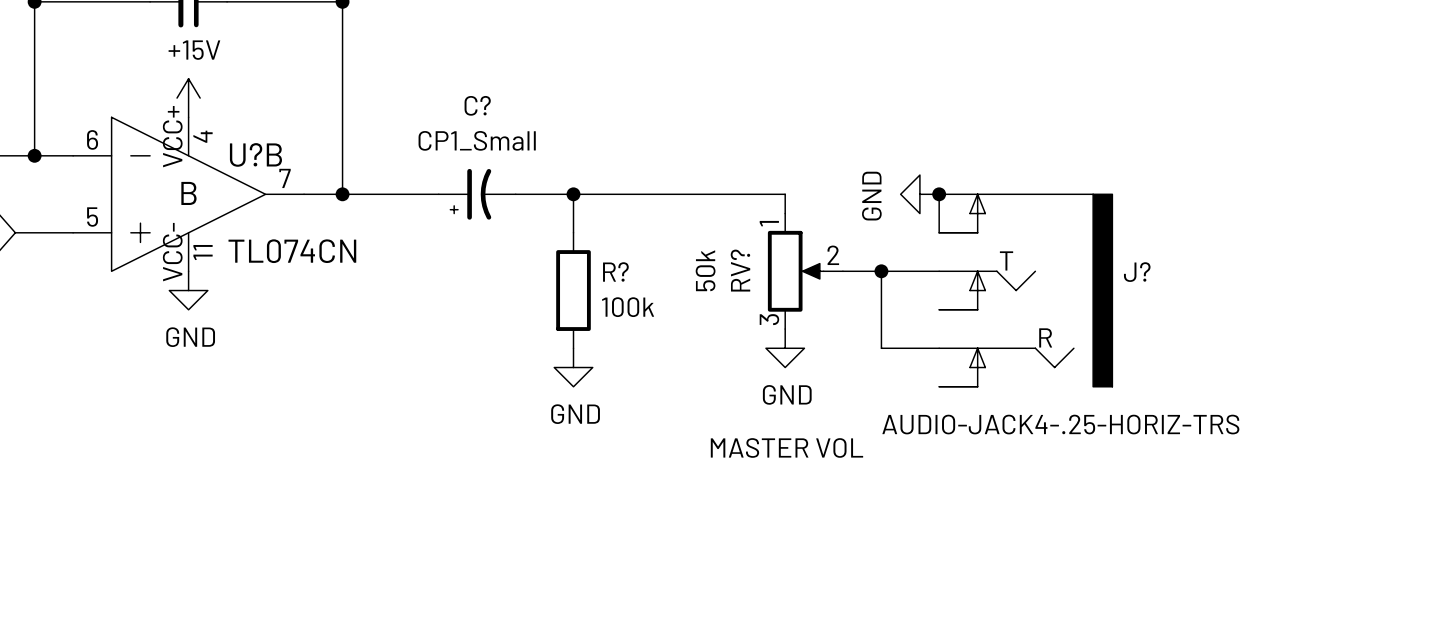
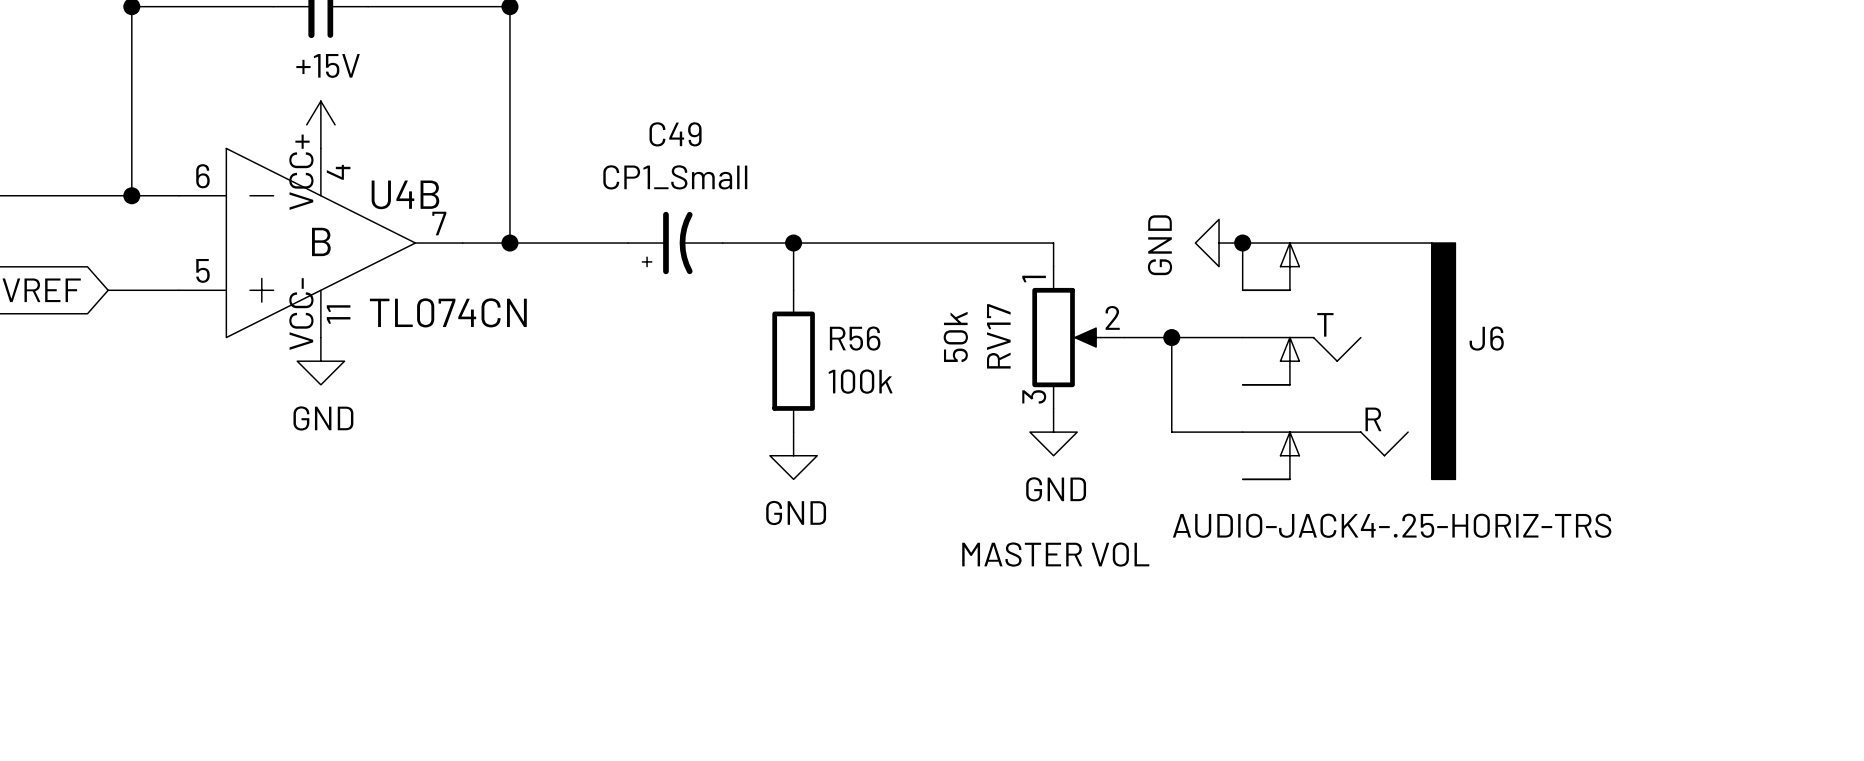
C? name: C? (477, 105) -> C49 (675, 134)
U?B name: U?B (255, 154) -> U4B (405, 194)
RV? name: RV? (740, 270) -> RV17 (998, 336)
R? name: R? (615, 271) -> R56 (855, 338)
J? name: J? (1137, 272) -> J6 (1486, 338)

